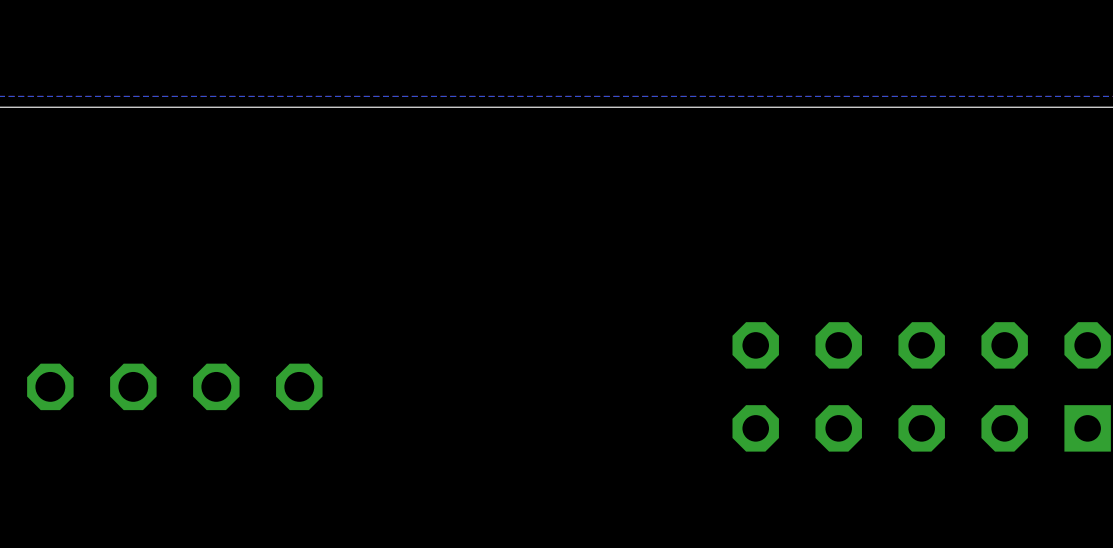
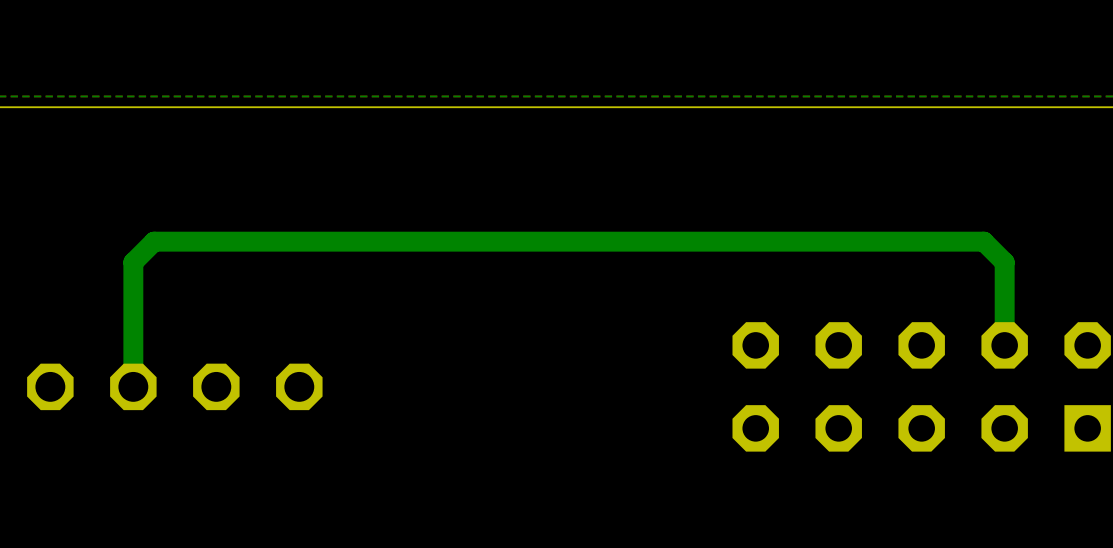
bottom track: none -> (1004, 345) (1004, 262) (983, 241) (154, 241) (133, 262) (133, 386)

